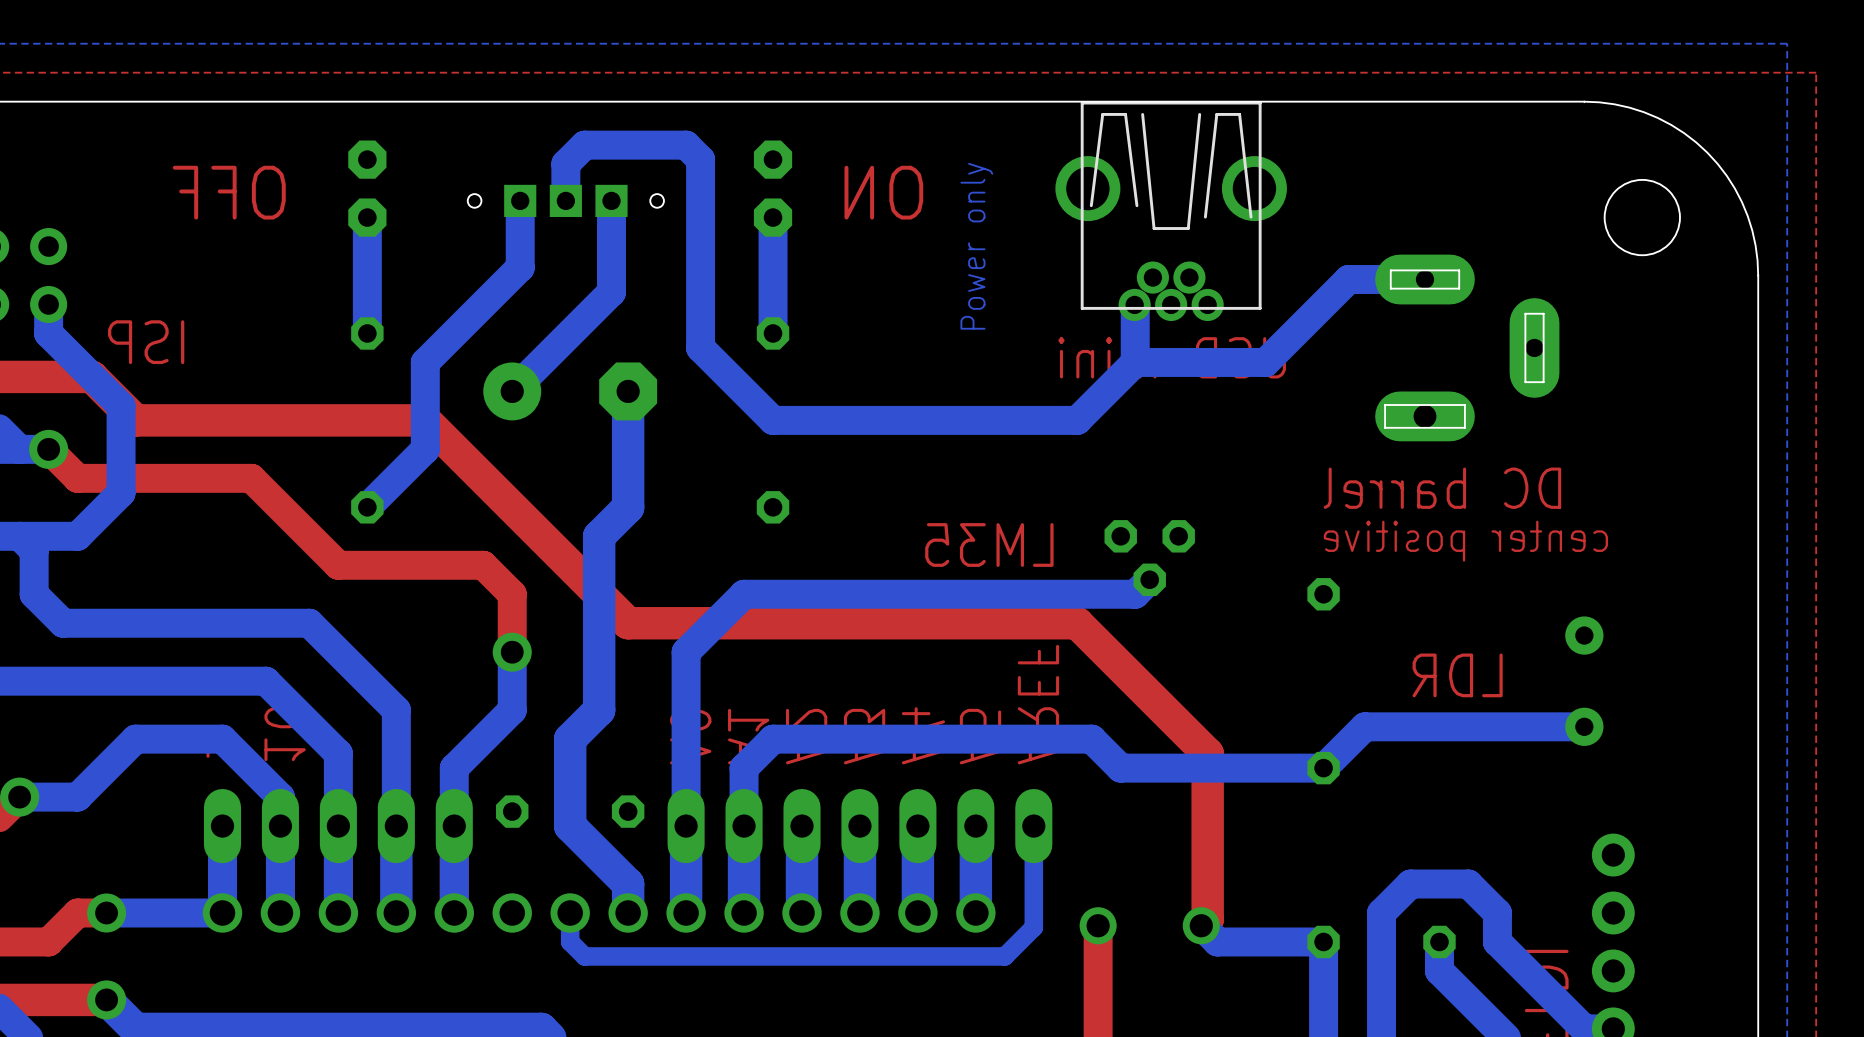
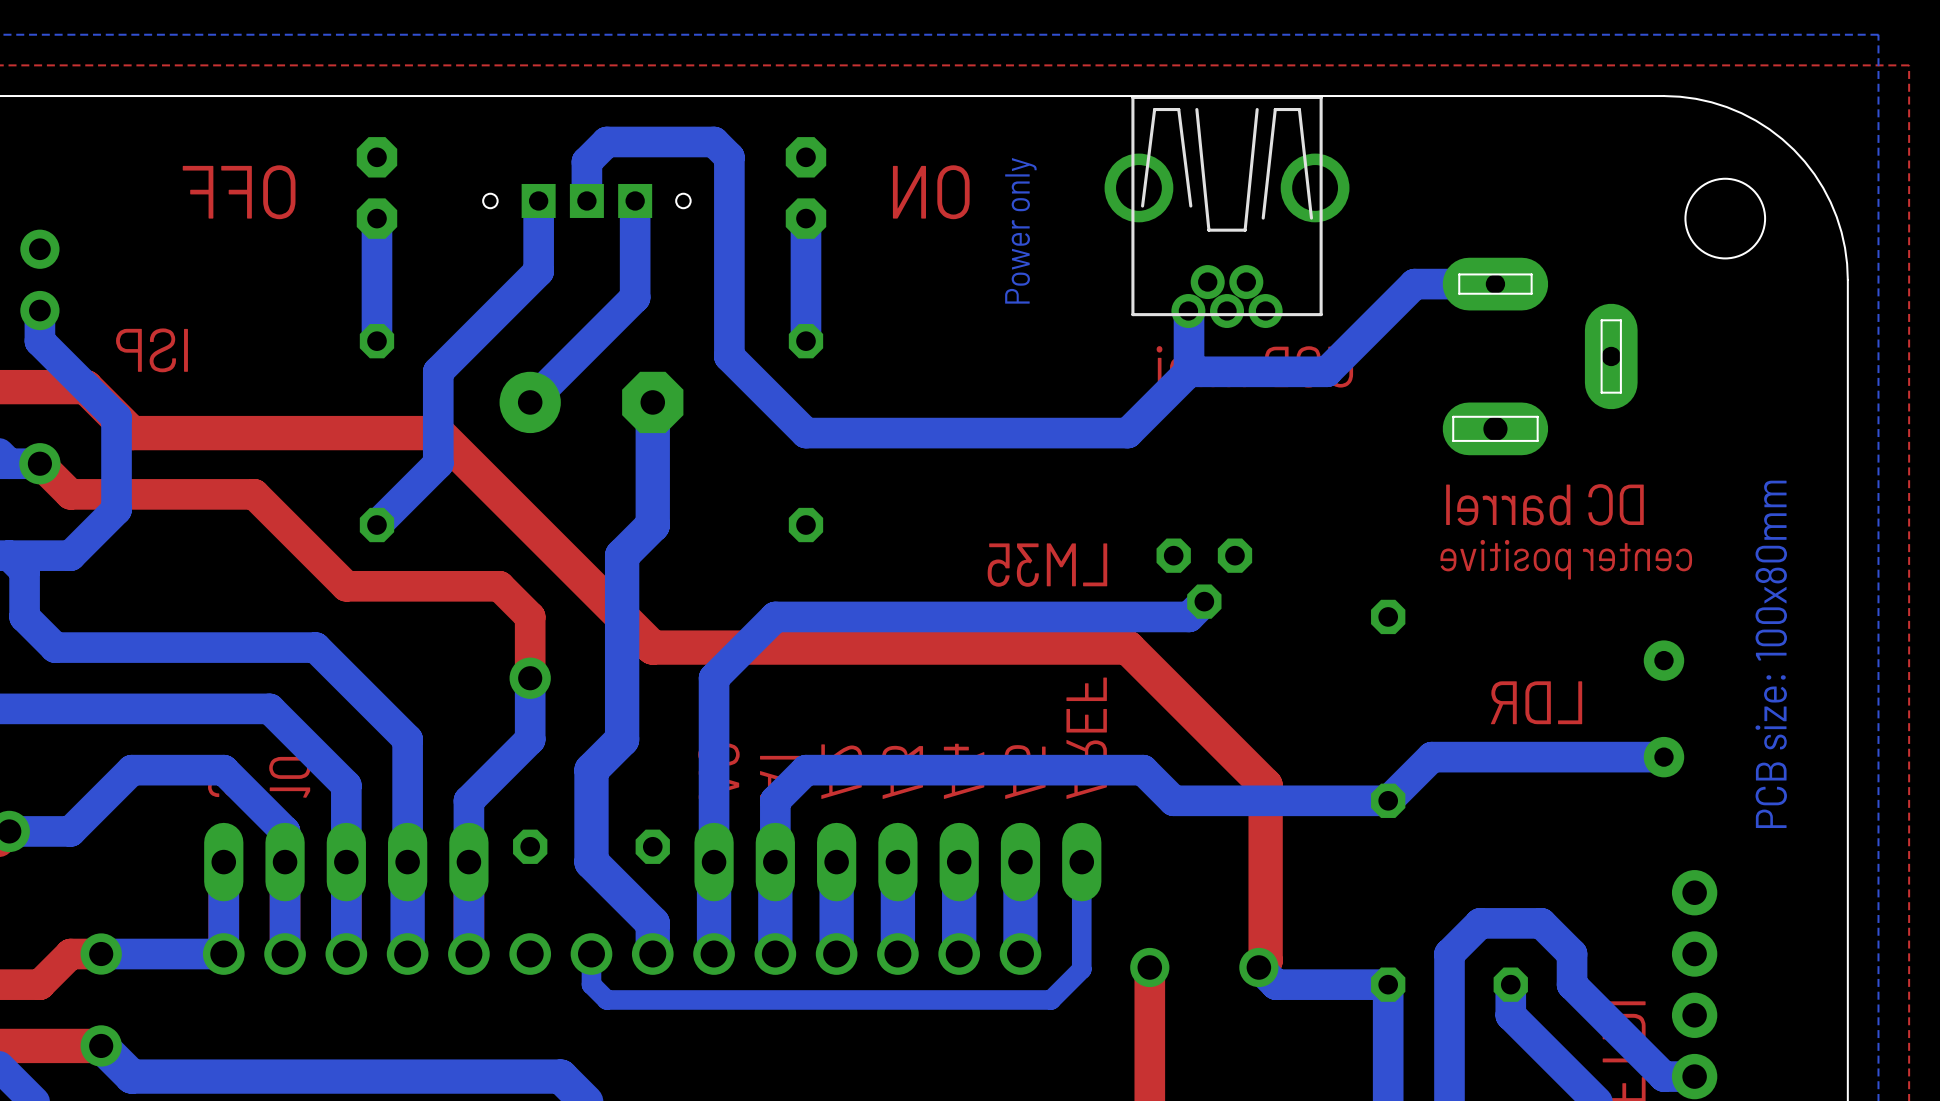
text: none -> PCB size: 100x80mm (1771, 654)

